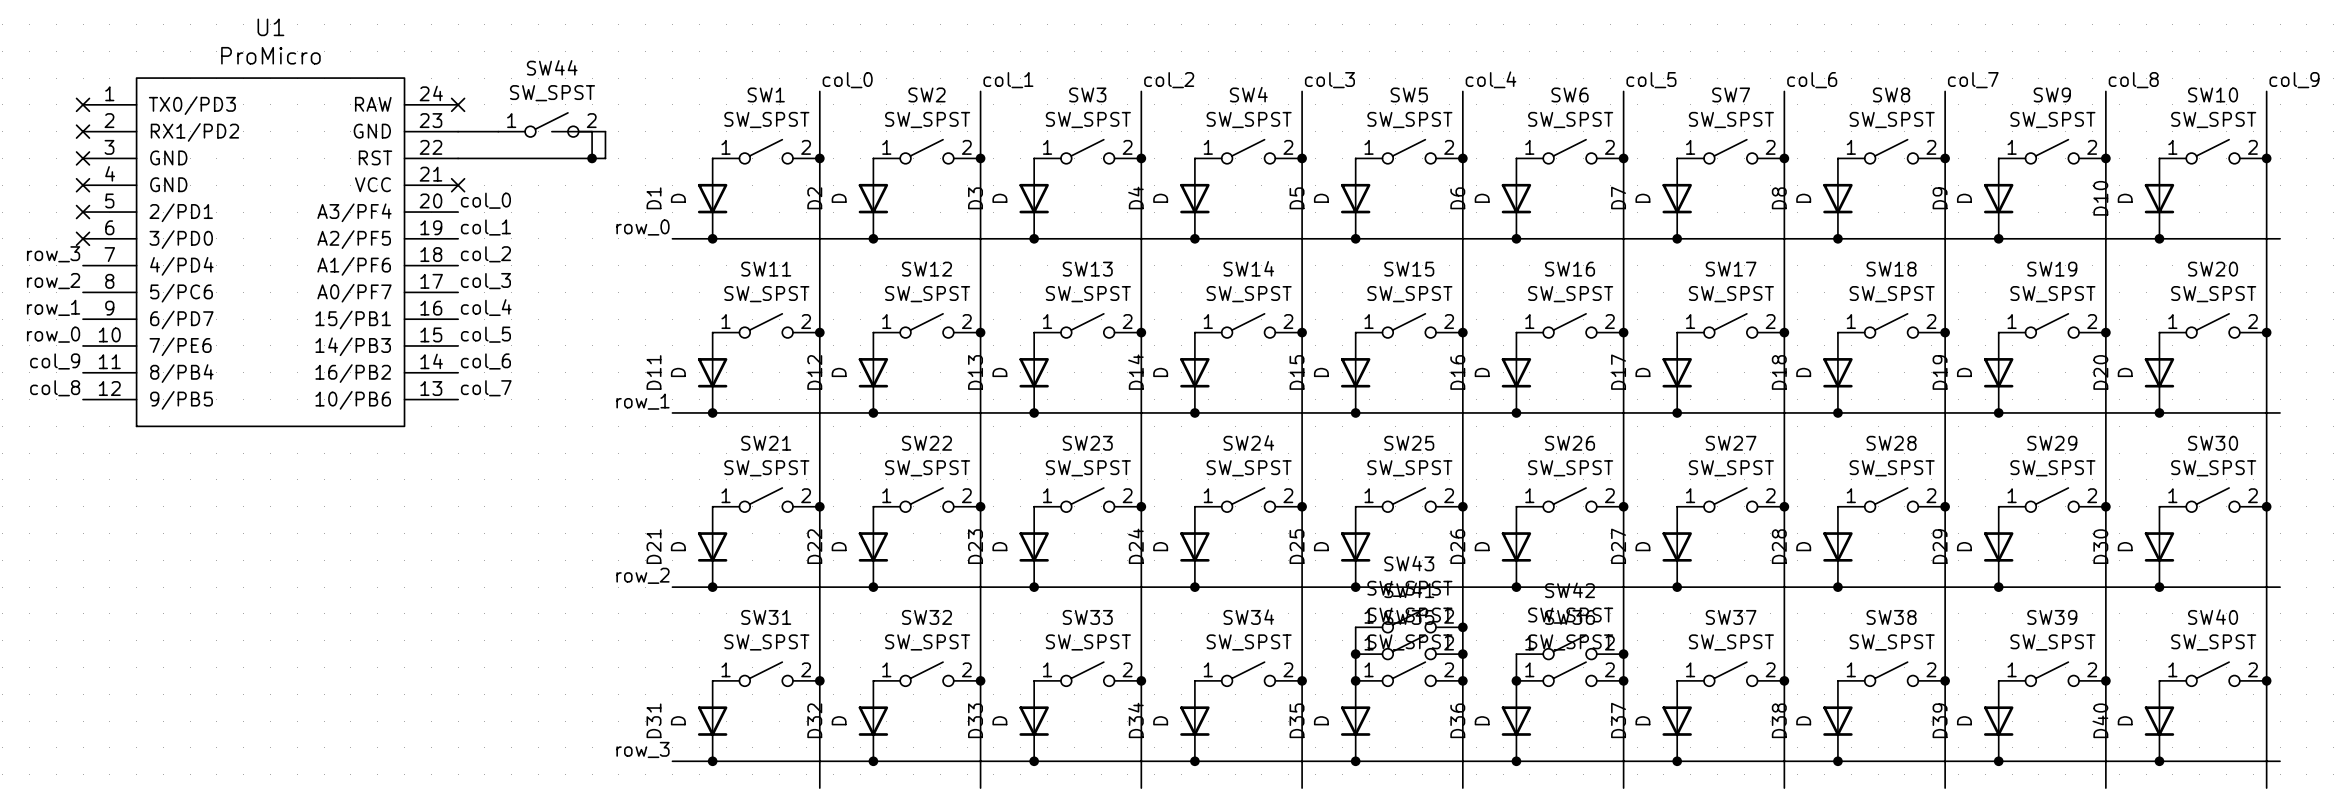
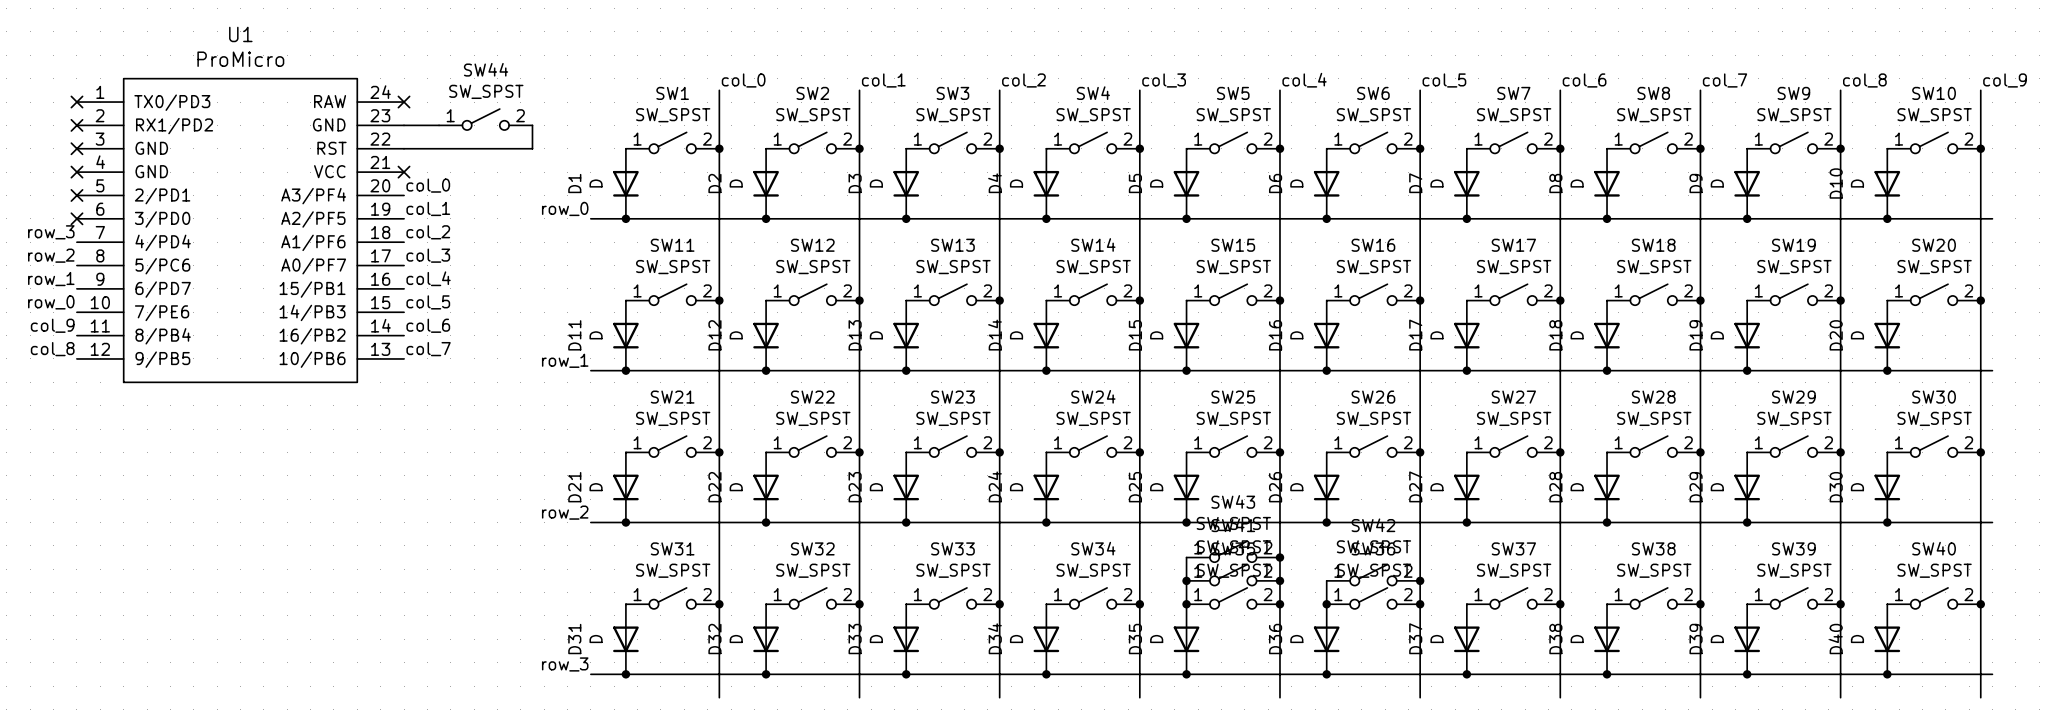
wire: (551, 131) (592, 131) (592, 158) -> none
junction: (592, 158) -> none

